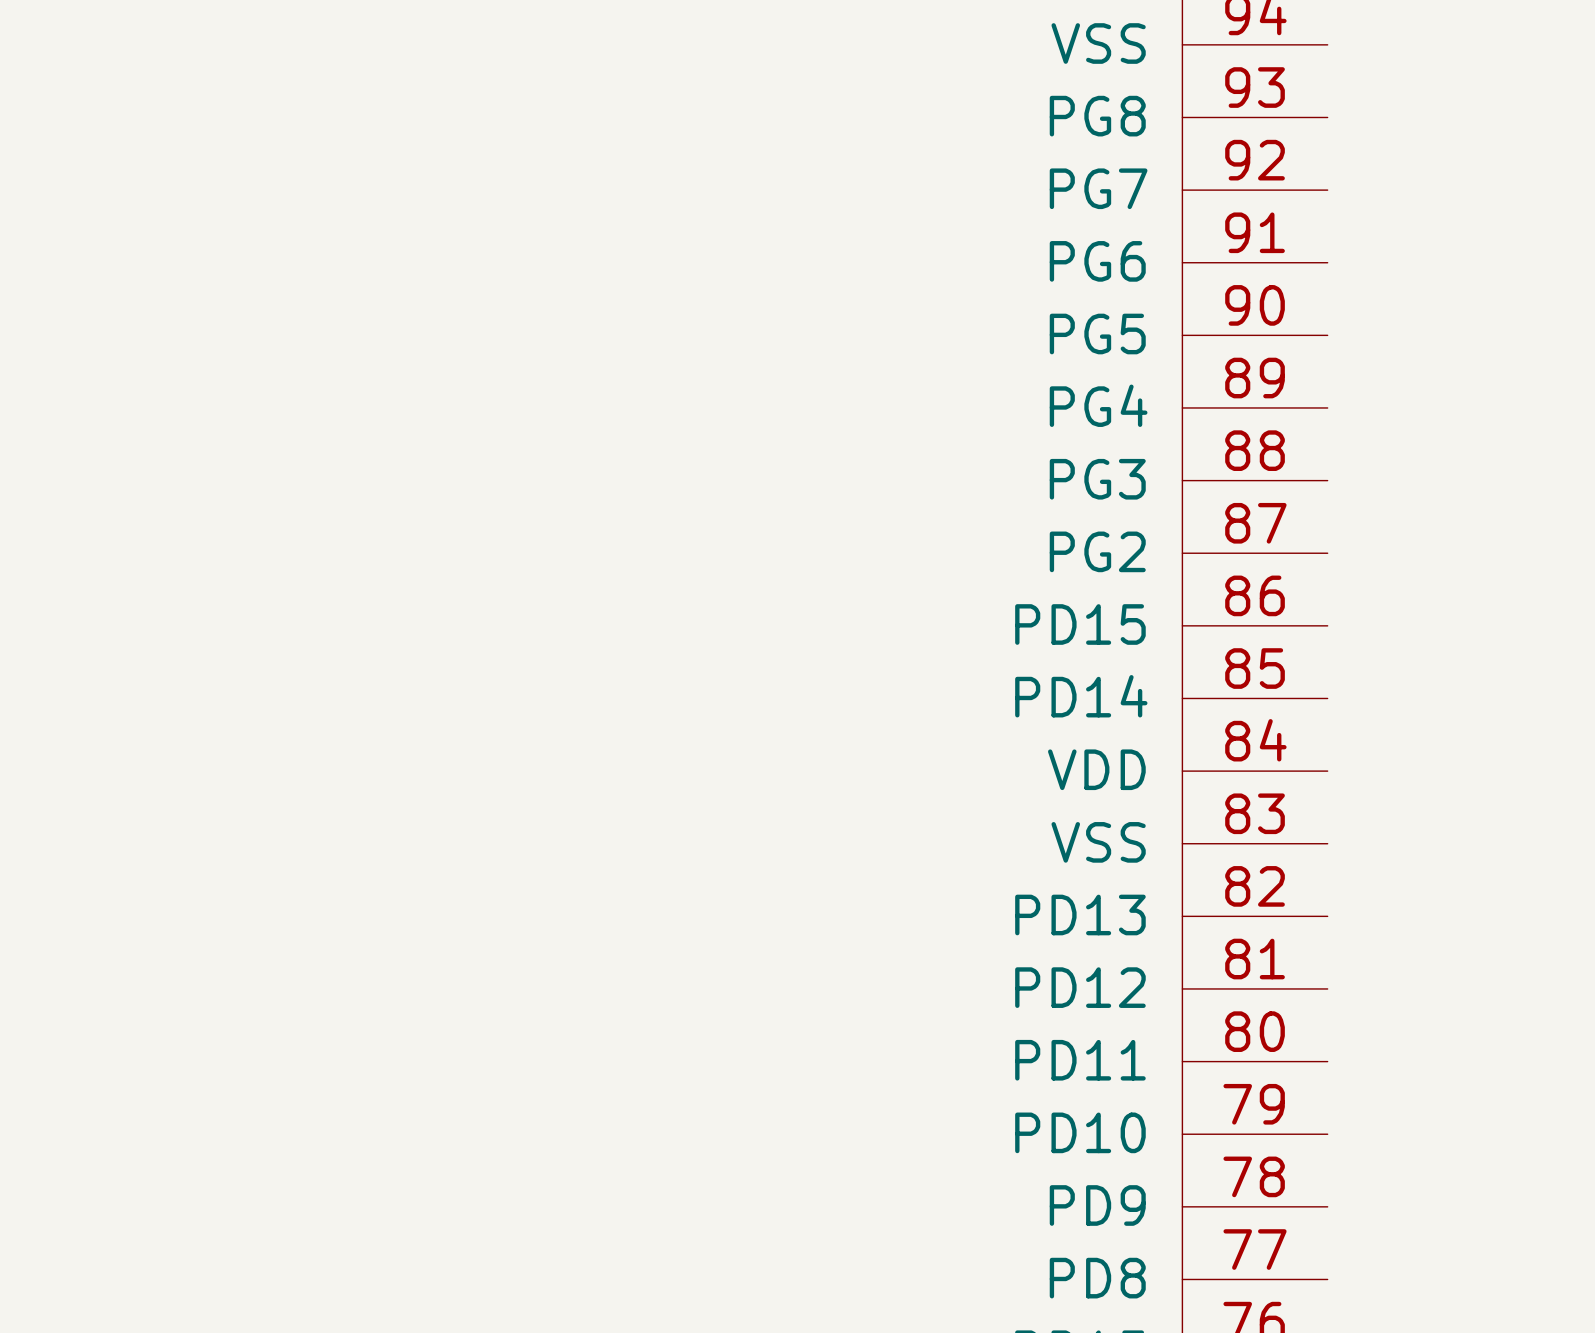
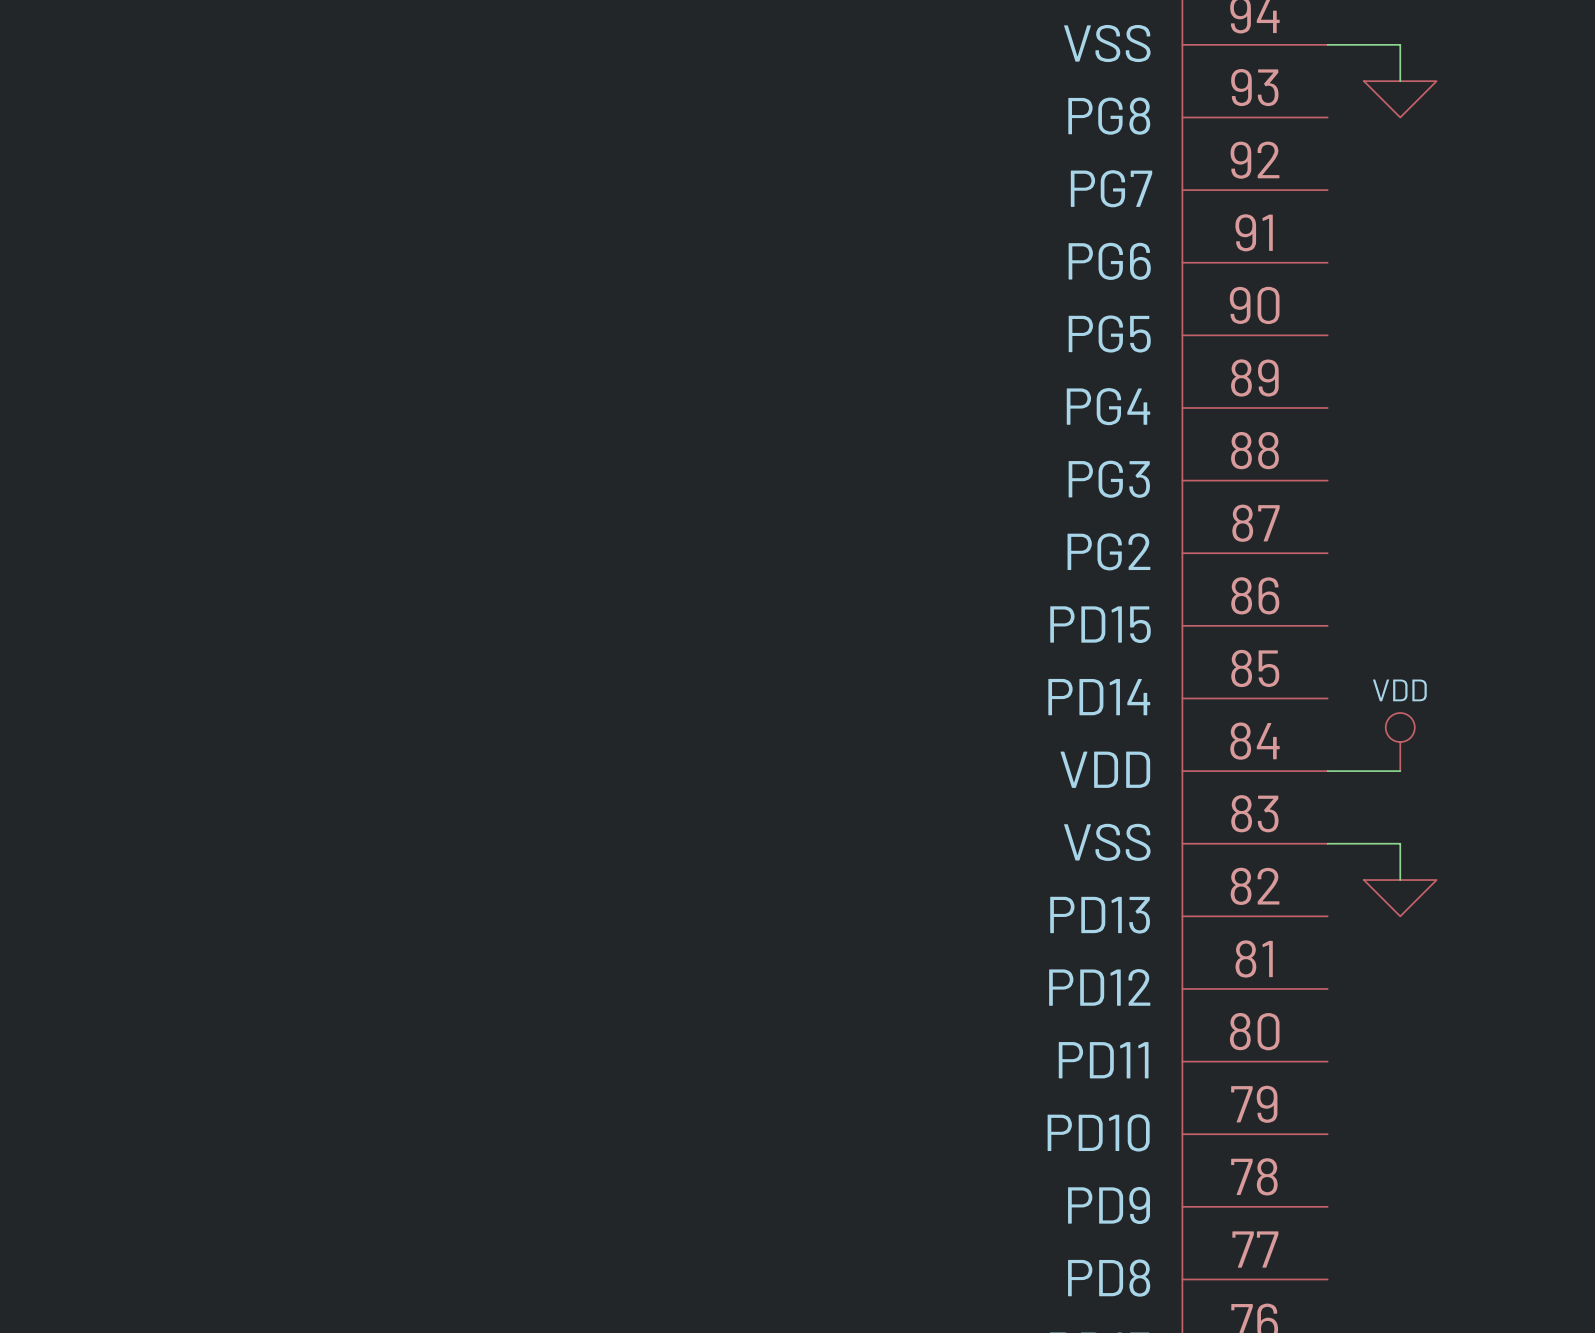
wire: none -> (1327, 44) (1400, 44) (1400, 81)
power symbol: none -> (1400, 99)
power symbol: none -> VDD (1400, 742)
wire: none -> (1327, 771) (1400, 771)
wire: none -> (1327, 843) (1400, 843) (1400, 880)
power symbol: none -> (1400, 898)

